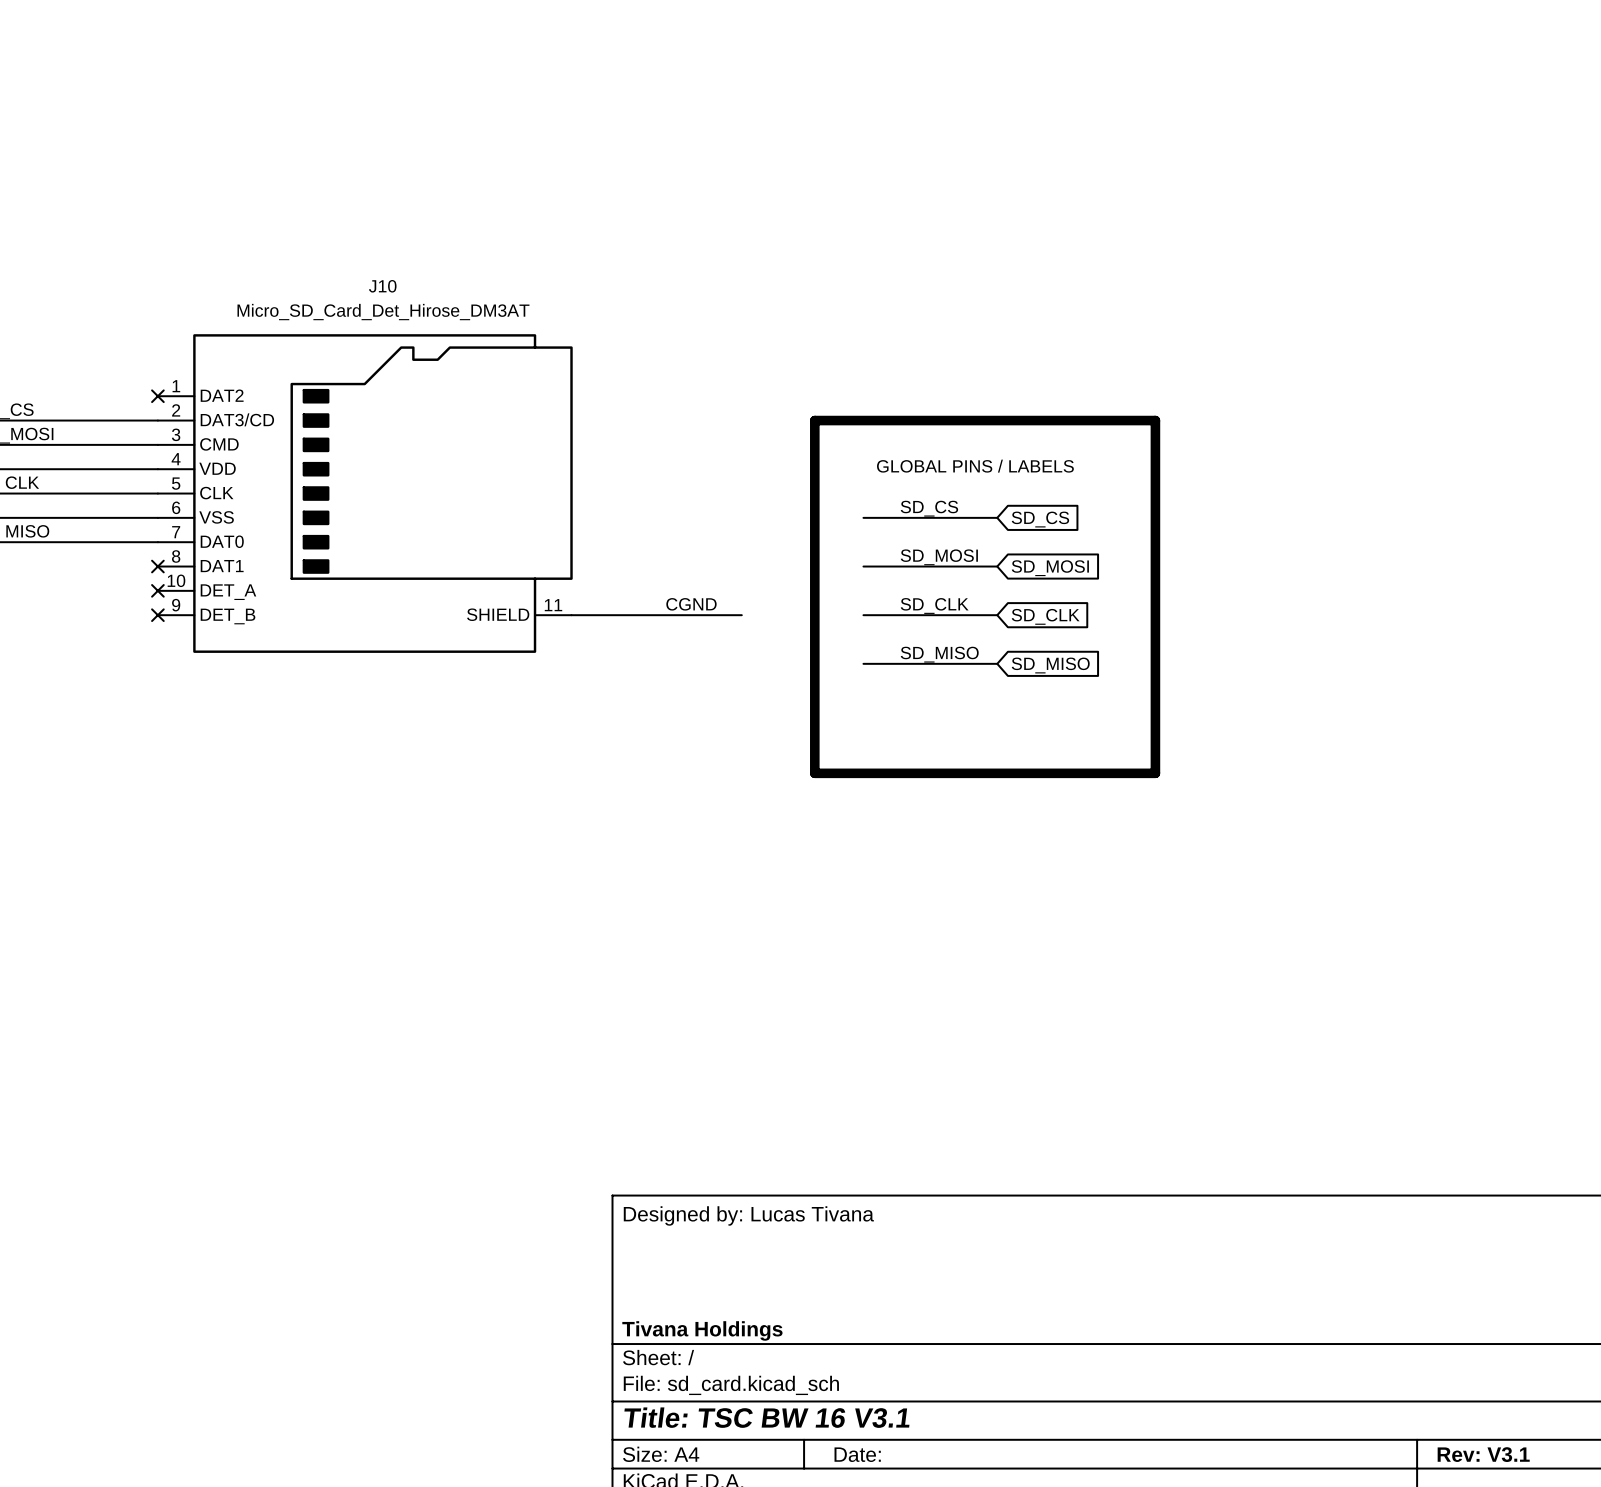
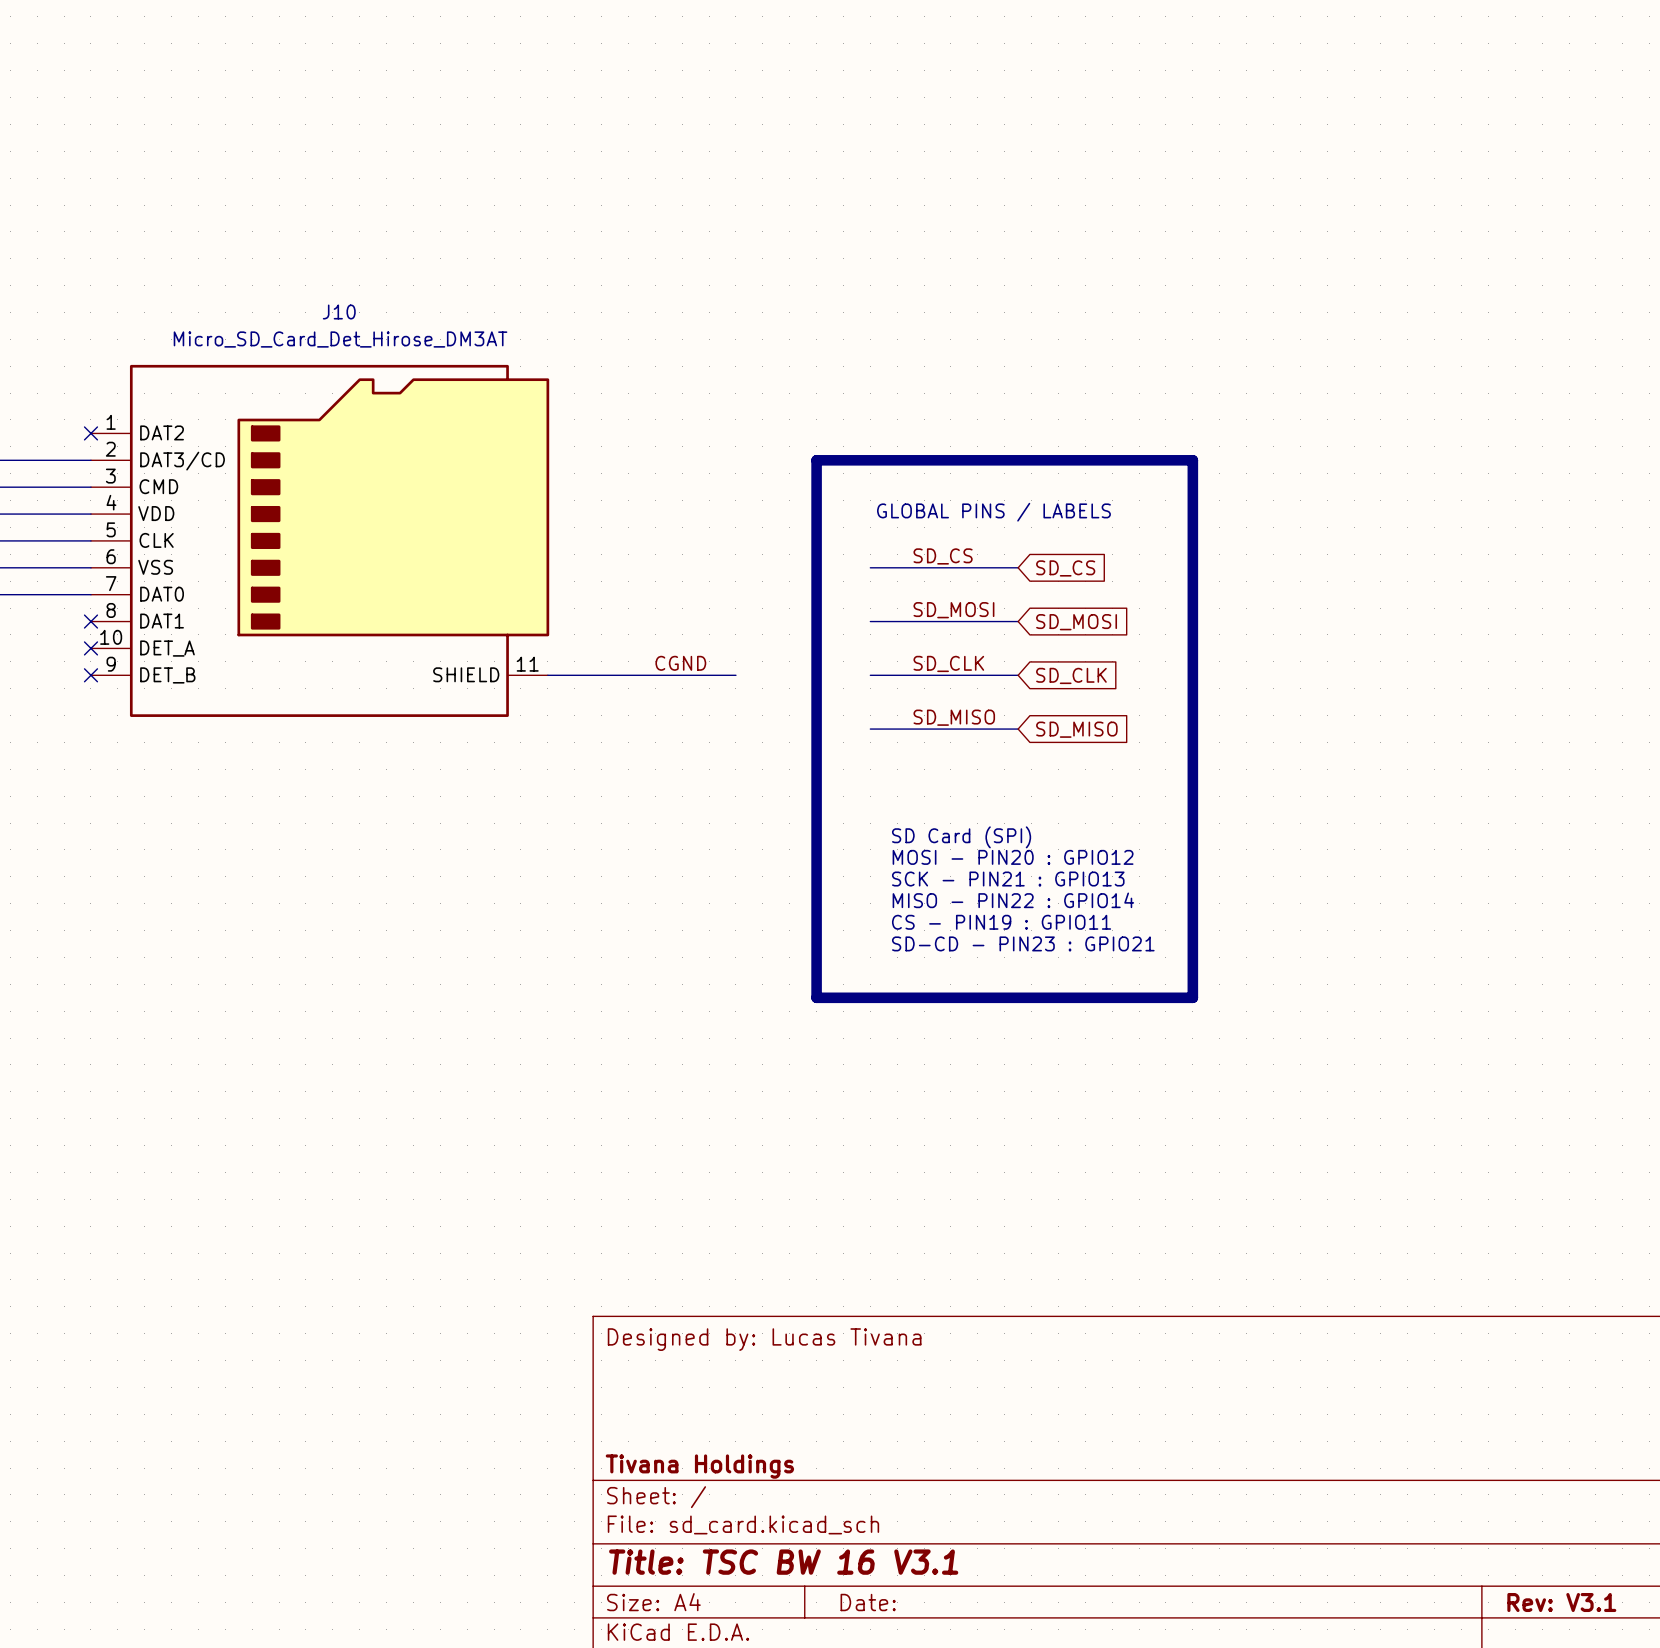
text: none -> SD Card (SPI) (961, 837)
line: (814, 773) (1155, 773) -> (816, 849) (816, 997) (1192, 997) (1192, 849)
text: none -> MOSI - PIN20 : GPIO12 (1013, 857)
text: none -> SCK - PIN21 : GPIO13 (1008, 879)
text: none -> MISO - PIN22 : GPIO14 (1013, 900)
text: none -> CS - PIN19 : GPIO11 (1001, 922)
text: none -> SD-CD - PIN23 : GPIO21 (1023, 943)

